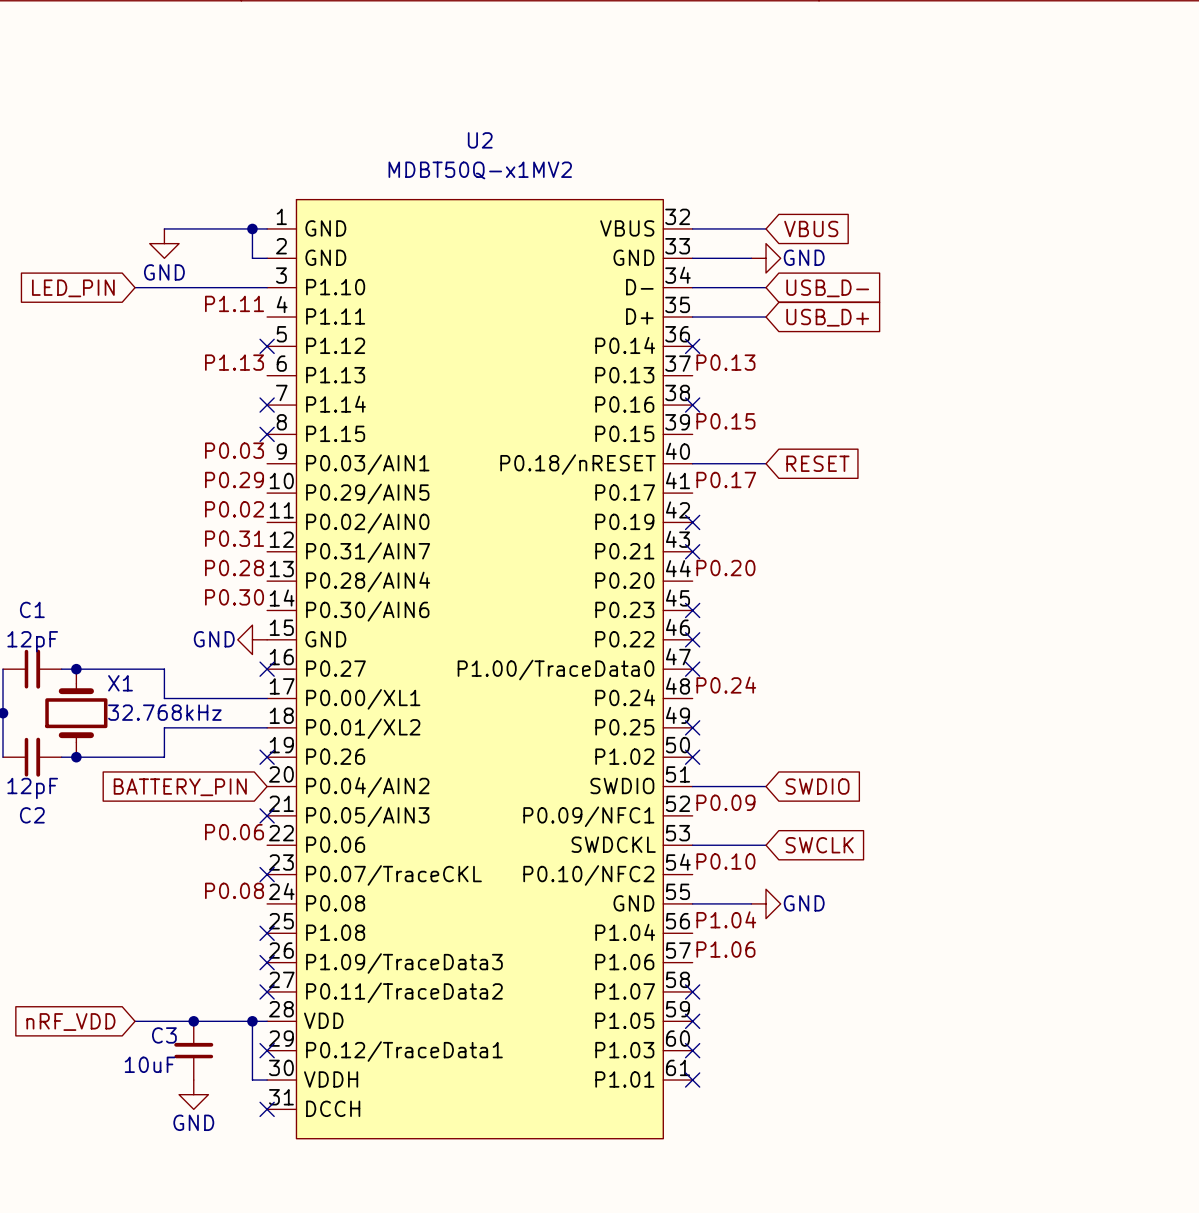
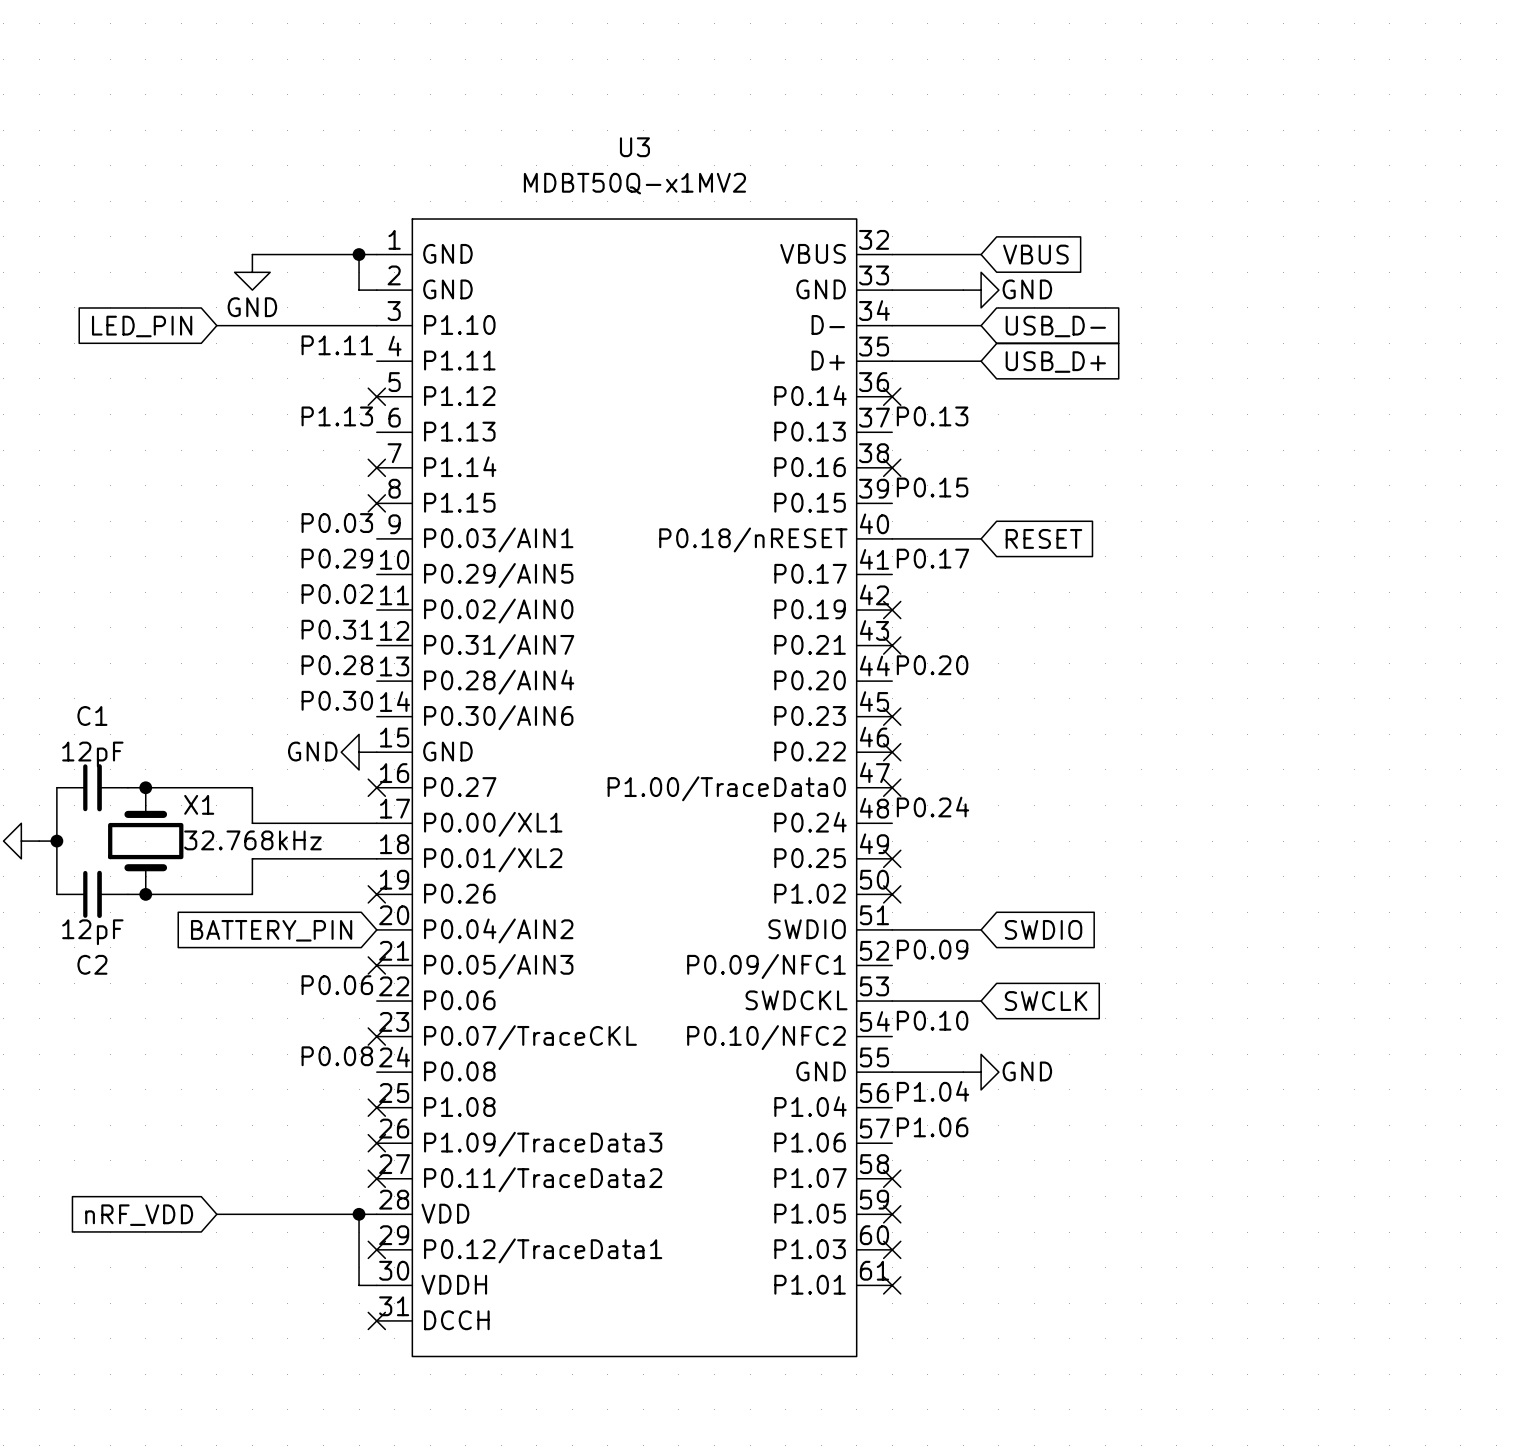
U2 name: U2 (480, 140) -> U3 (634, 147)
junction: (193, 1021) -> none
C3: 10uF (193, 1050) -> none
power symbol: GND (193, 1094) -> none

